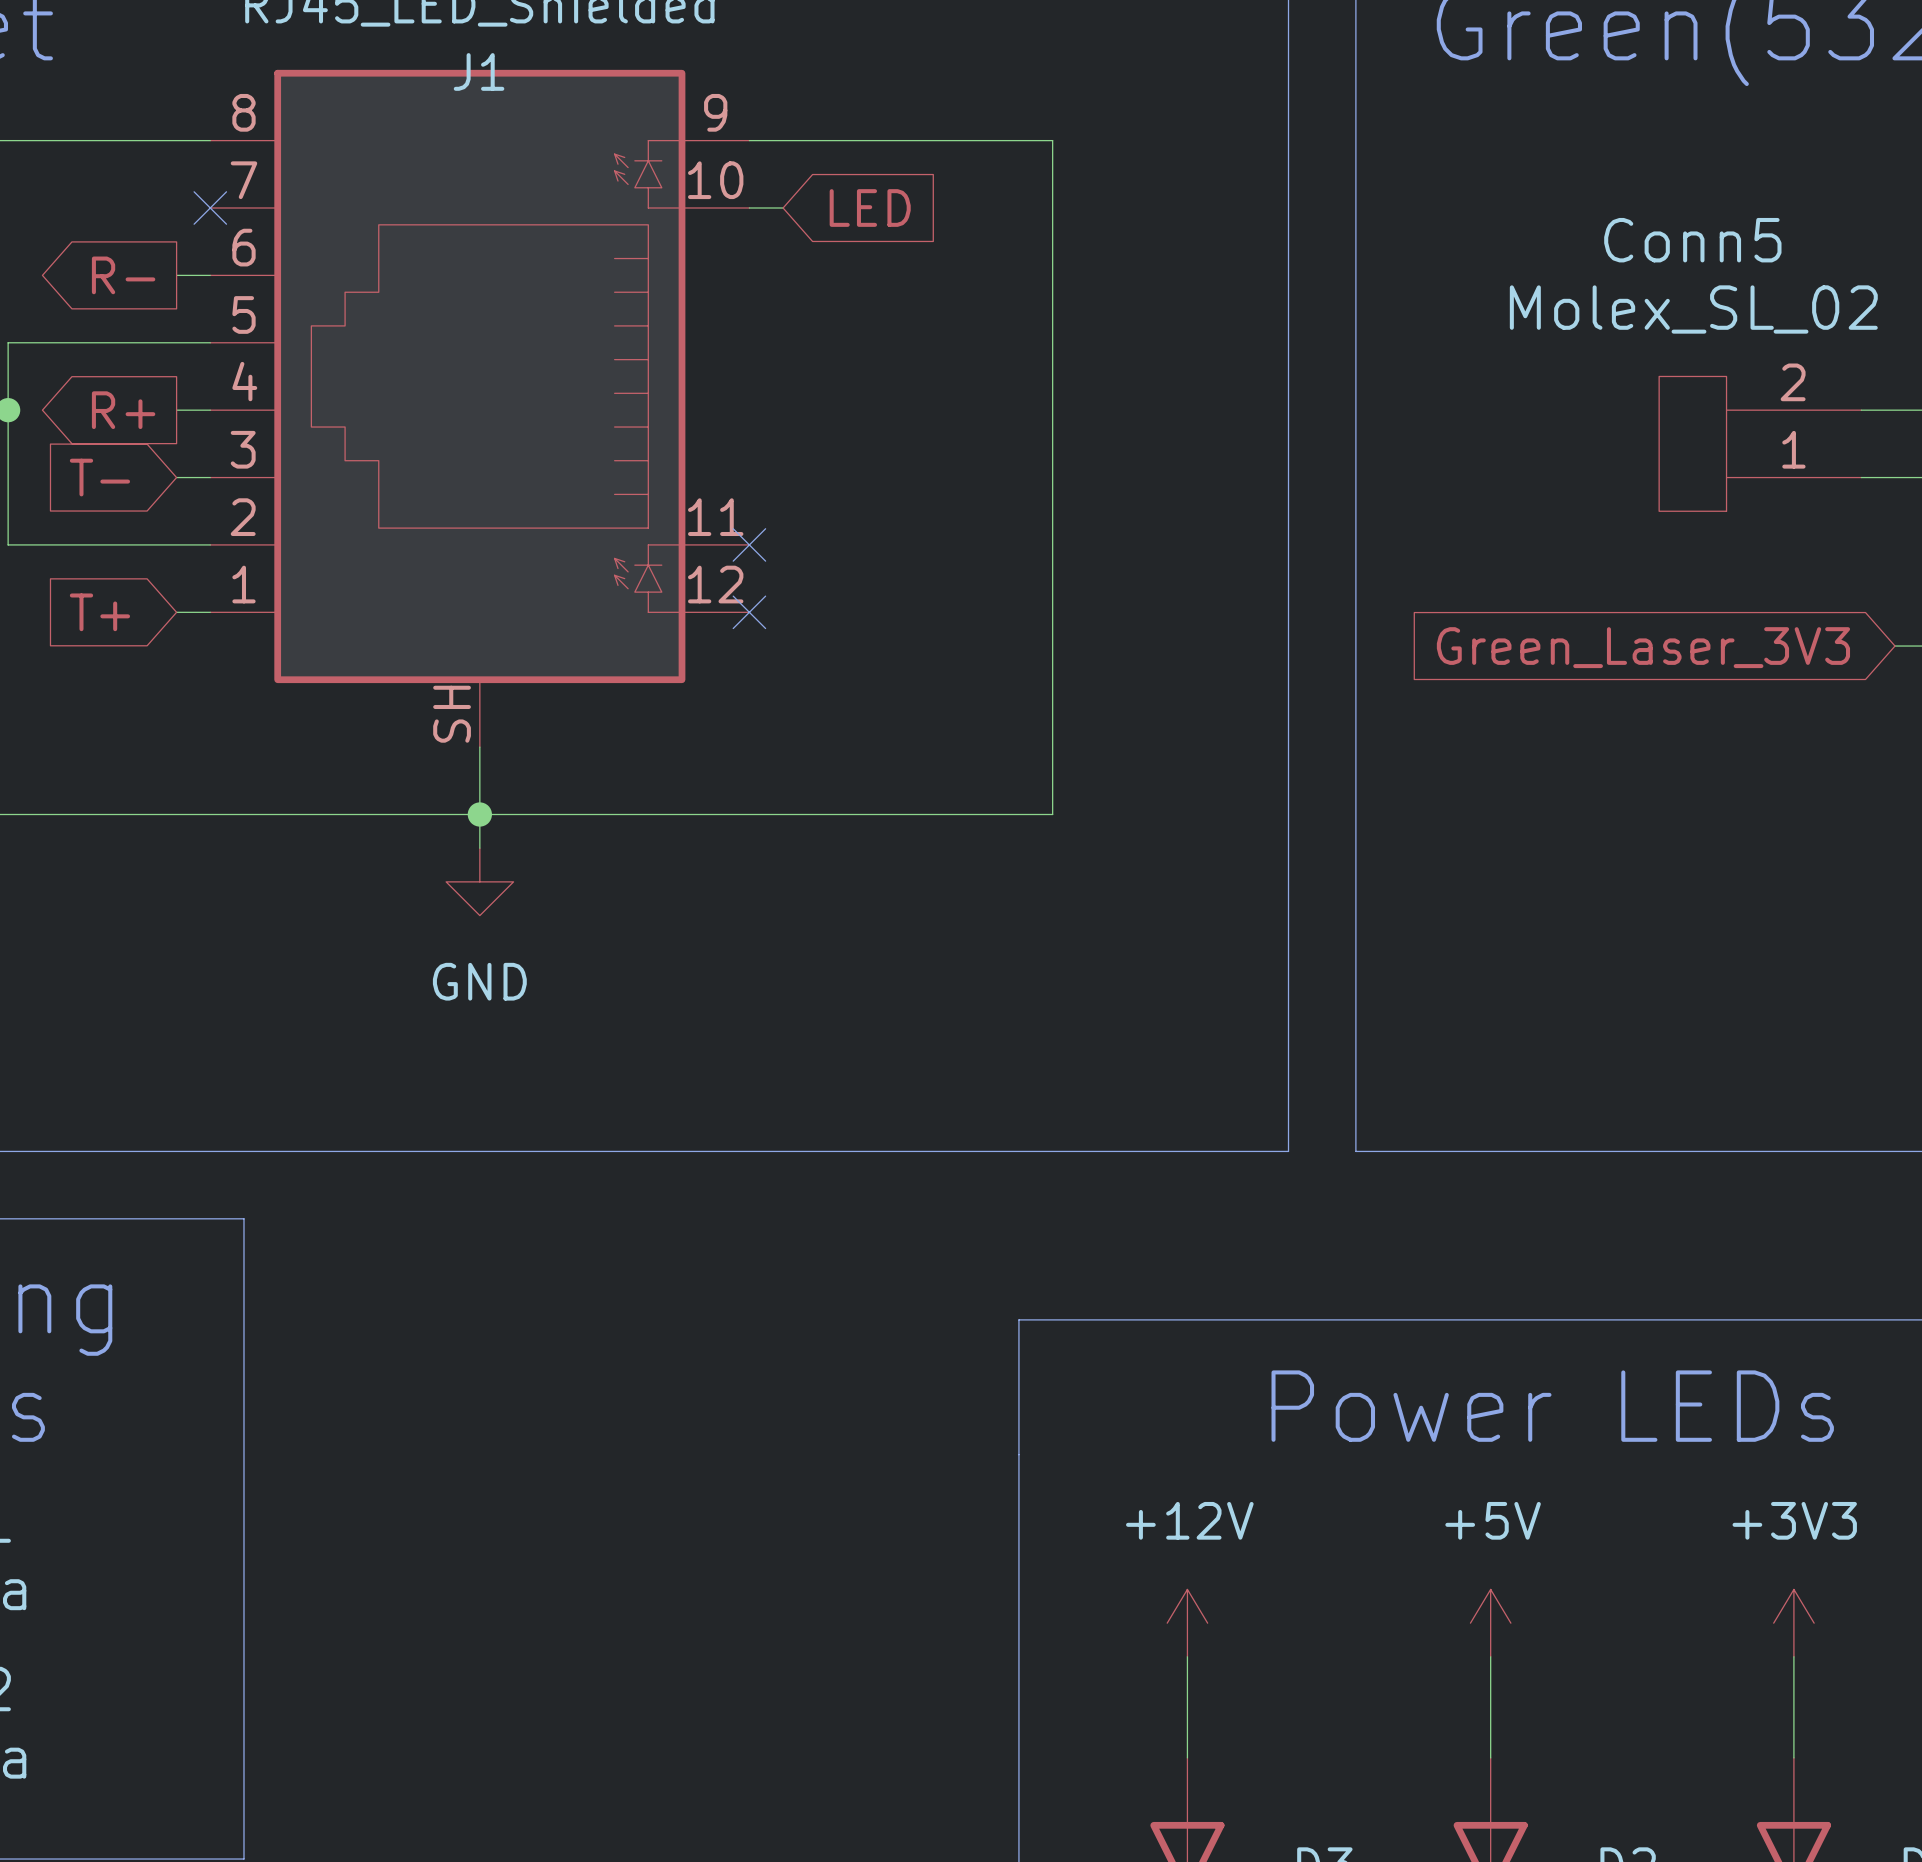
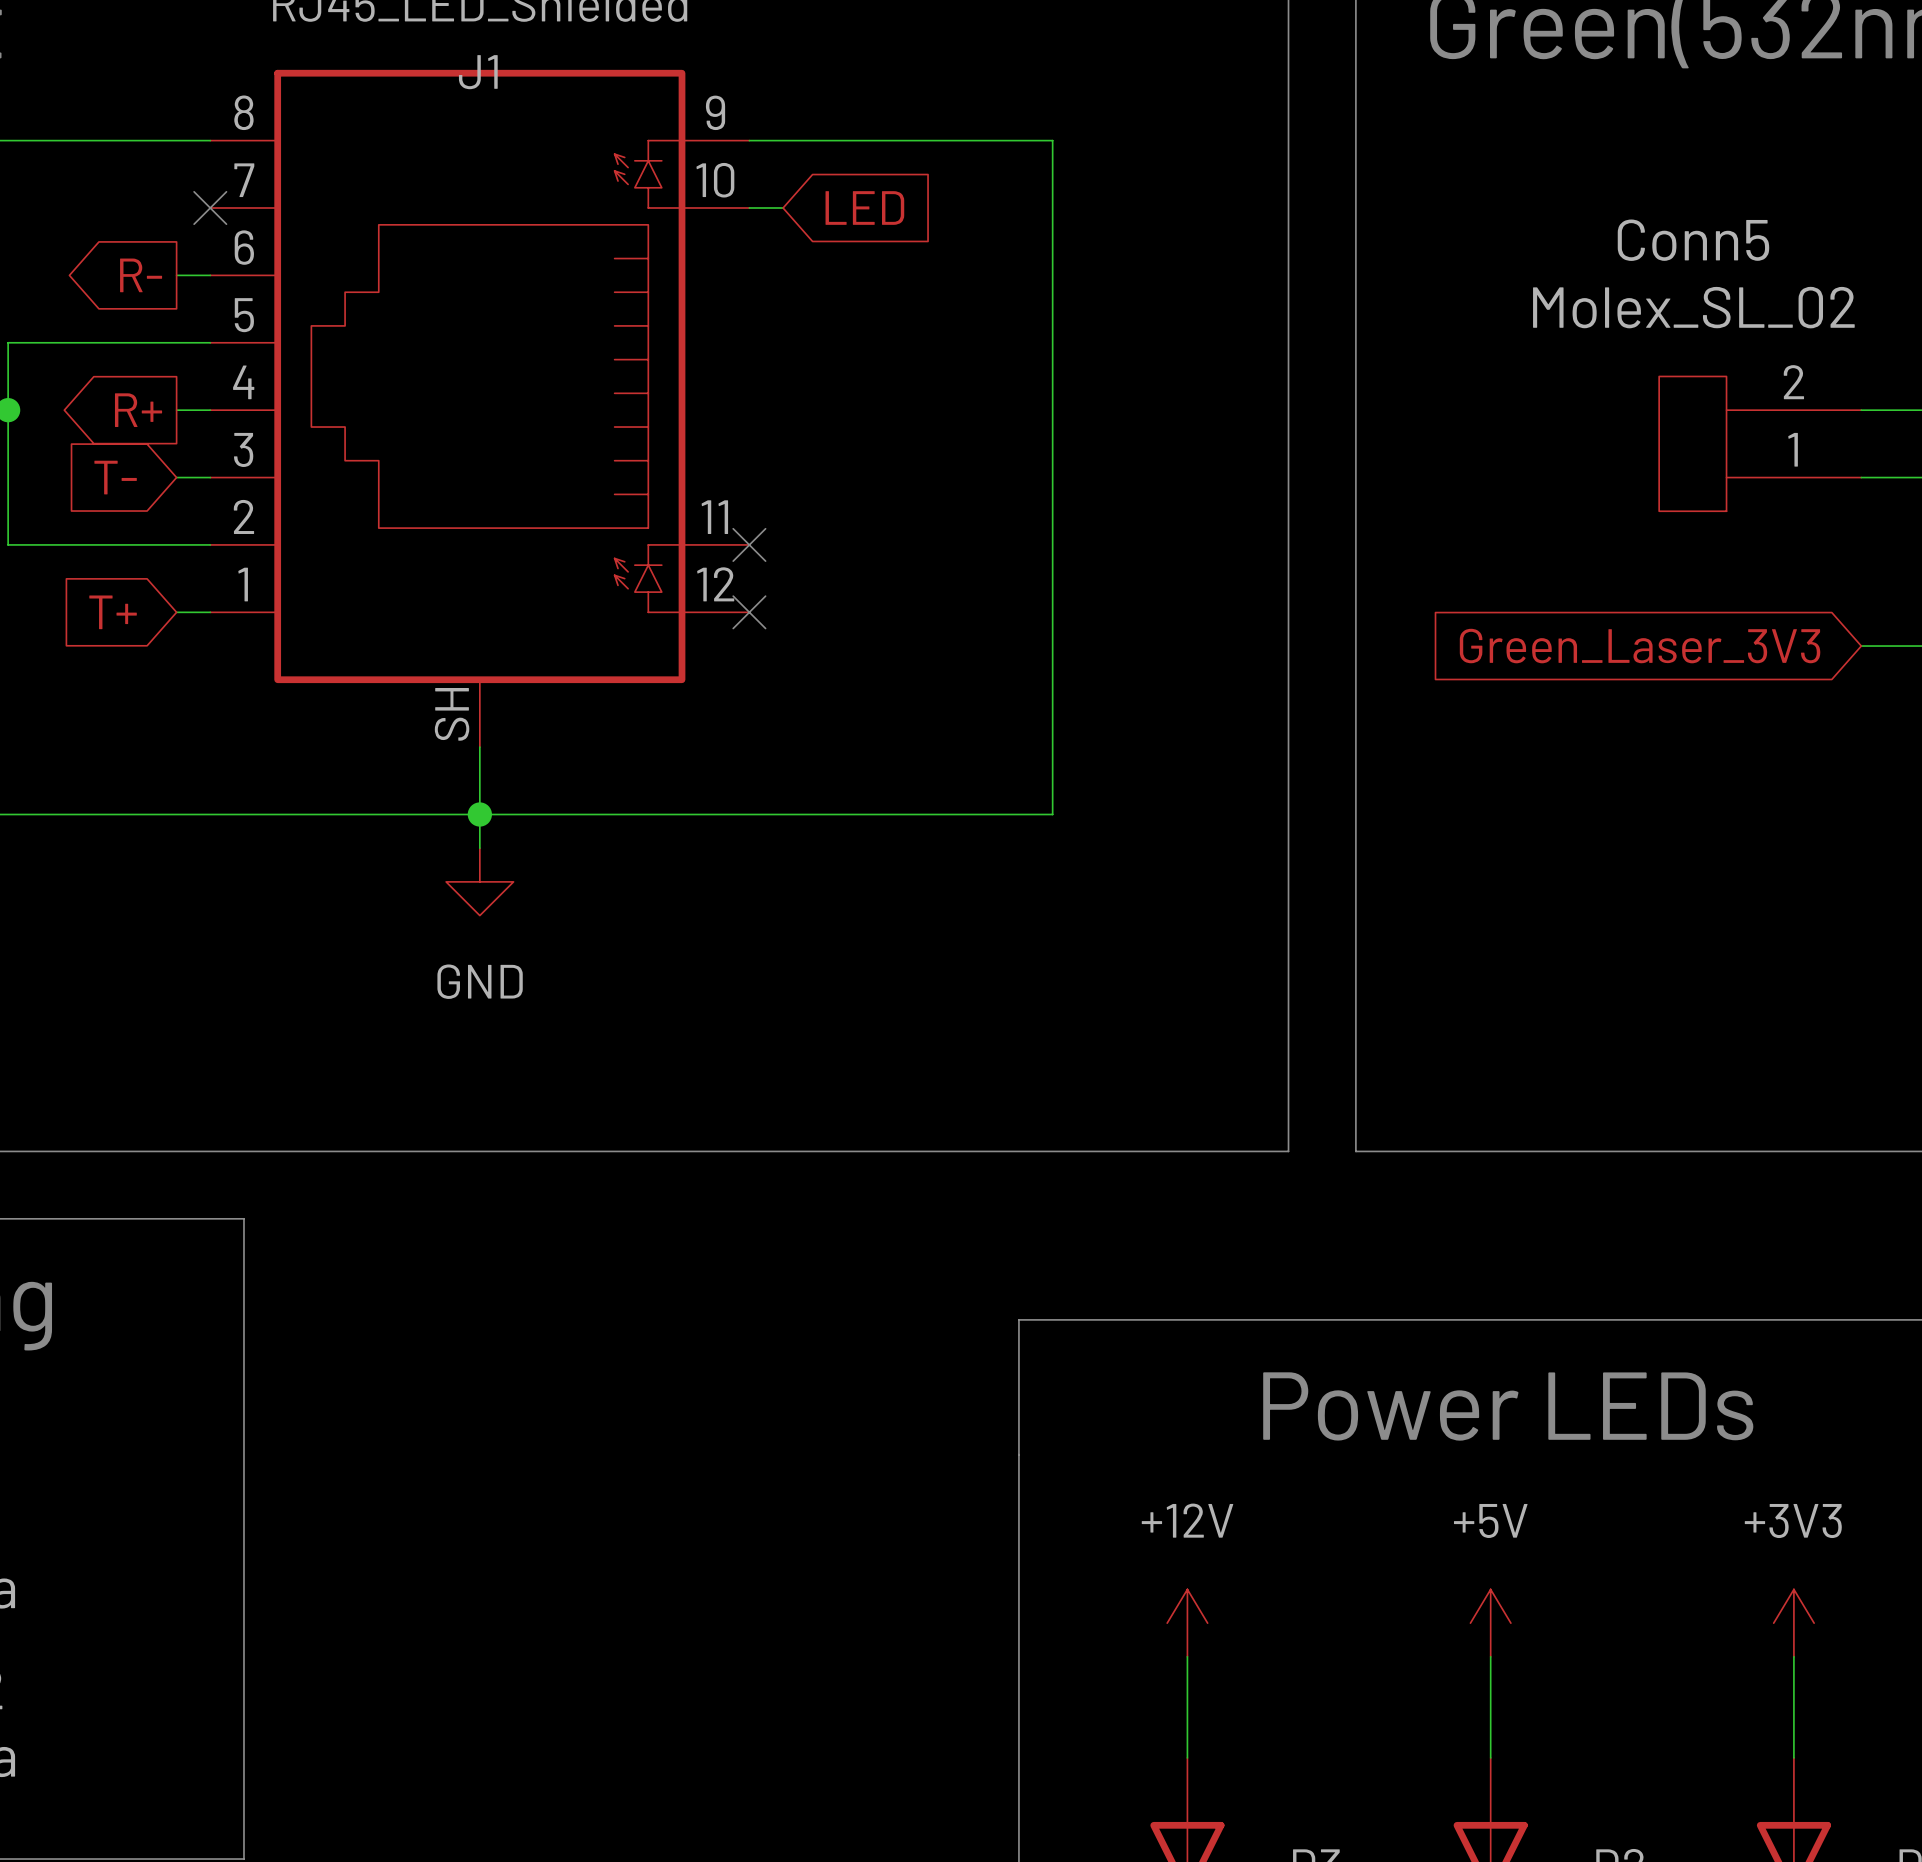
wire: none -> (1861, 646) (1895, 646)
global label position: Green_Laser_3V3 (1643, 647) -> Green_Laser_3V3 (1640, 646)

